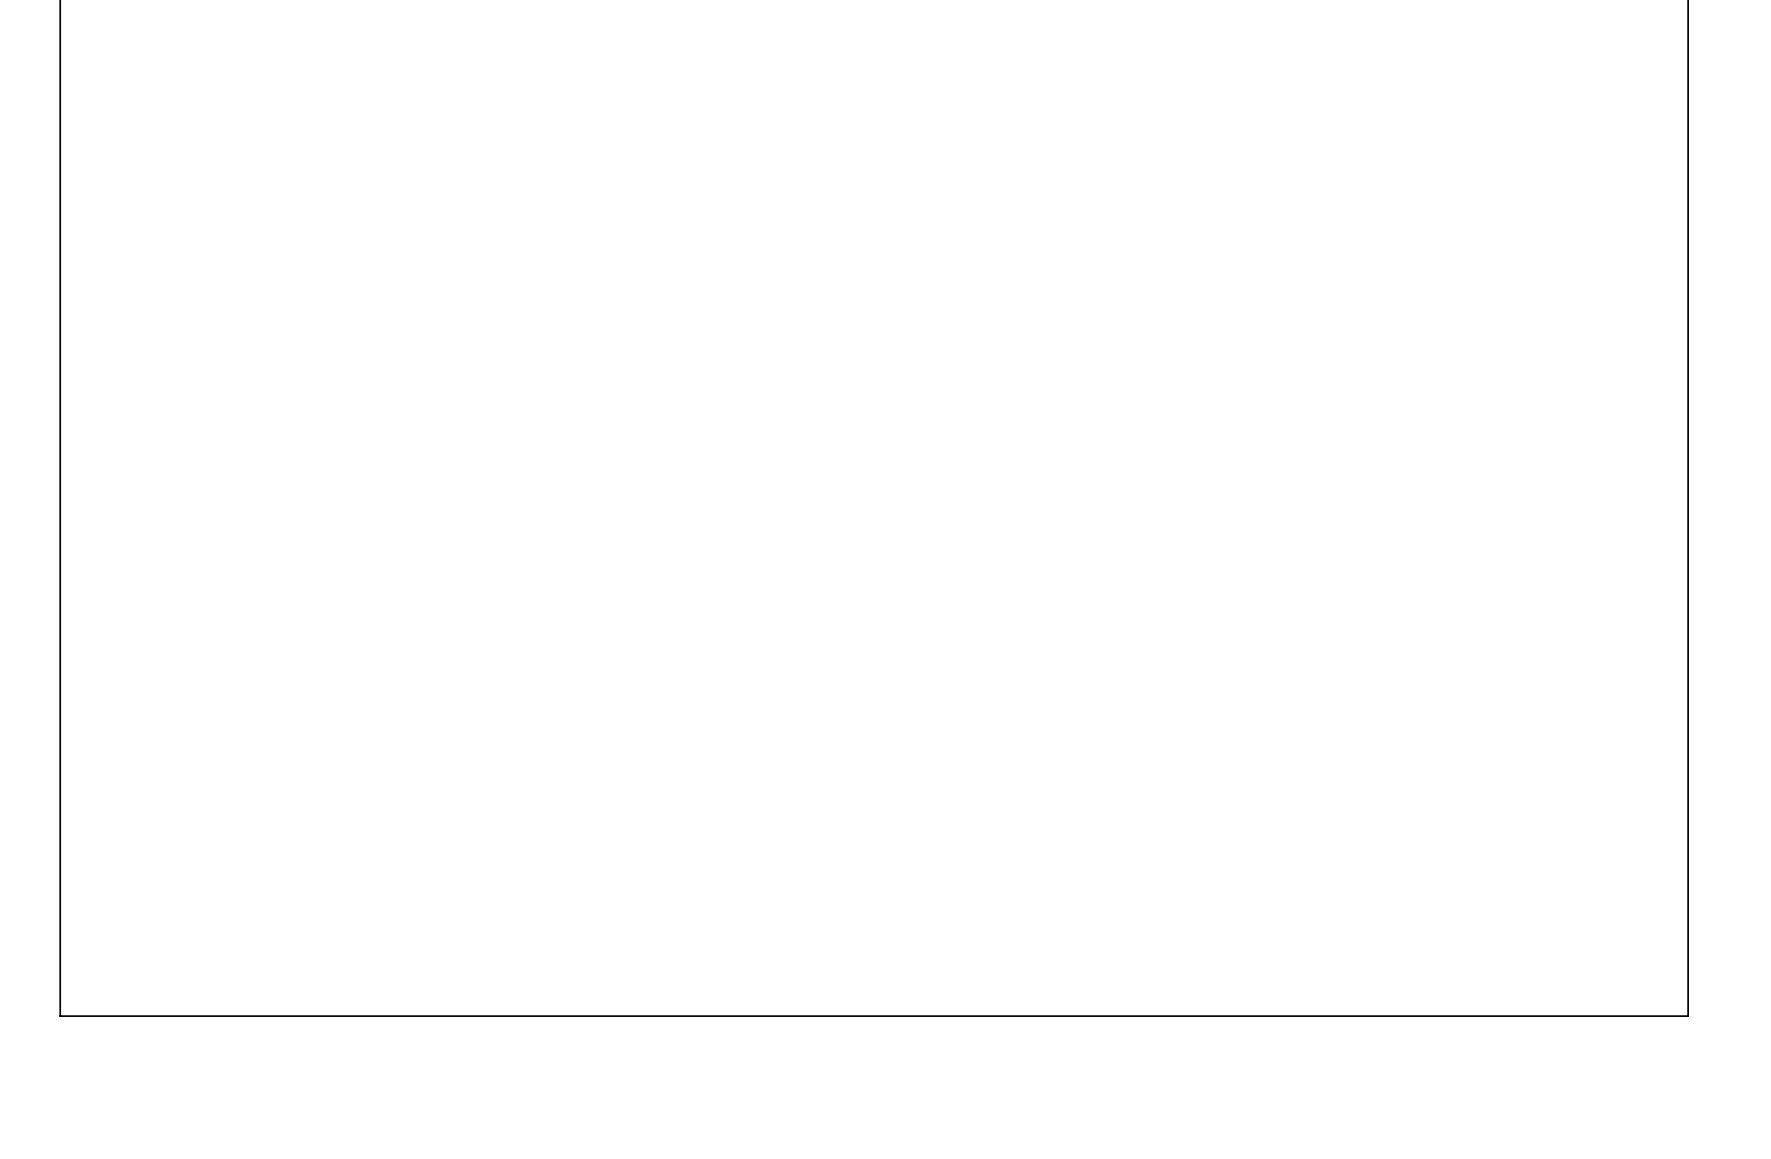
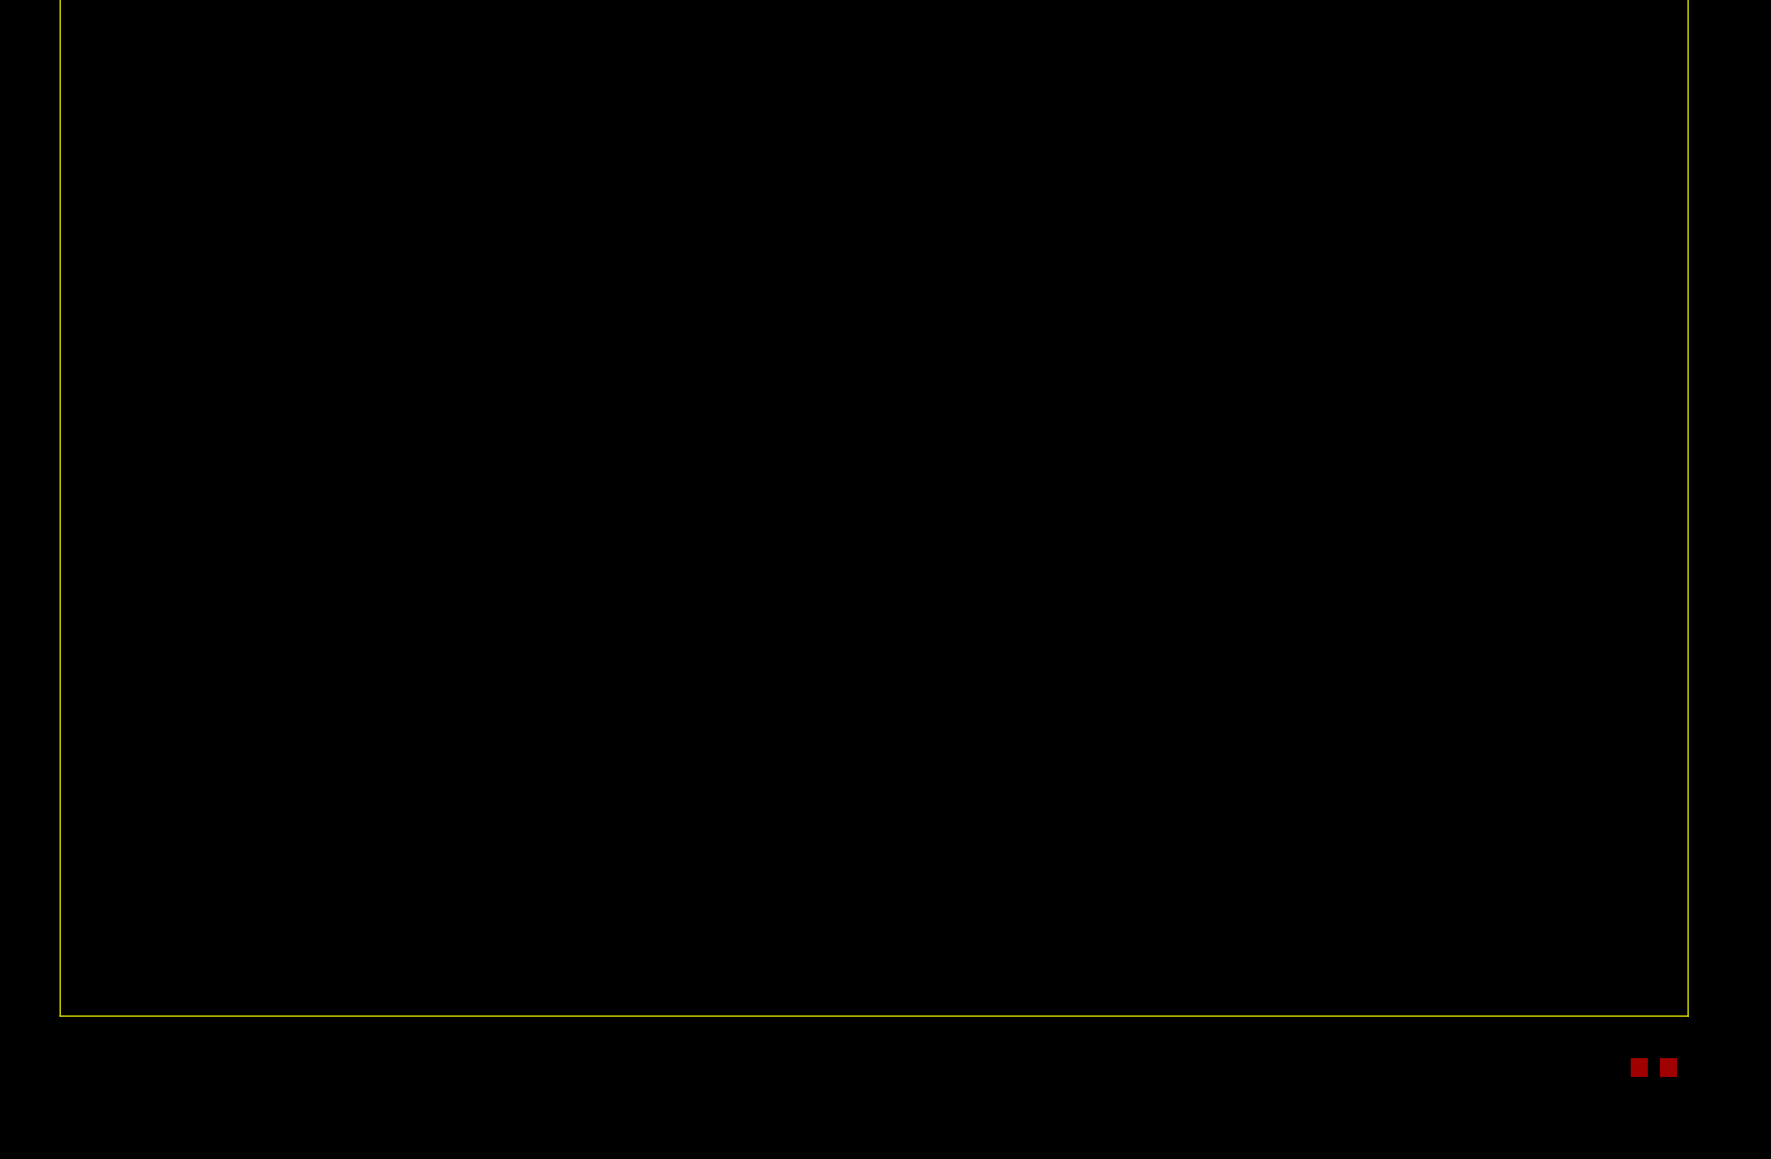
part: none -> (1653, 1067)

